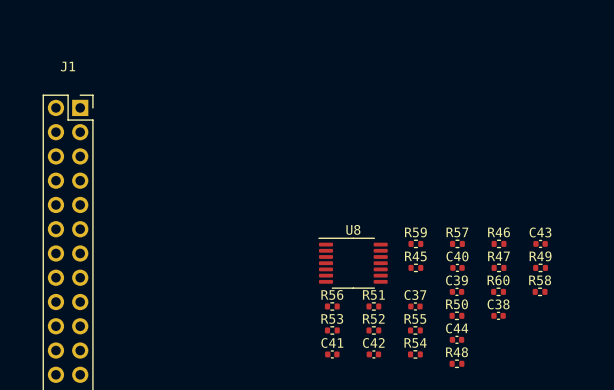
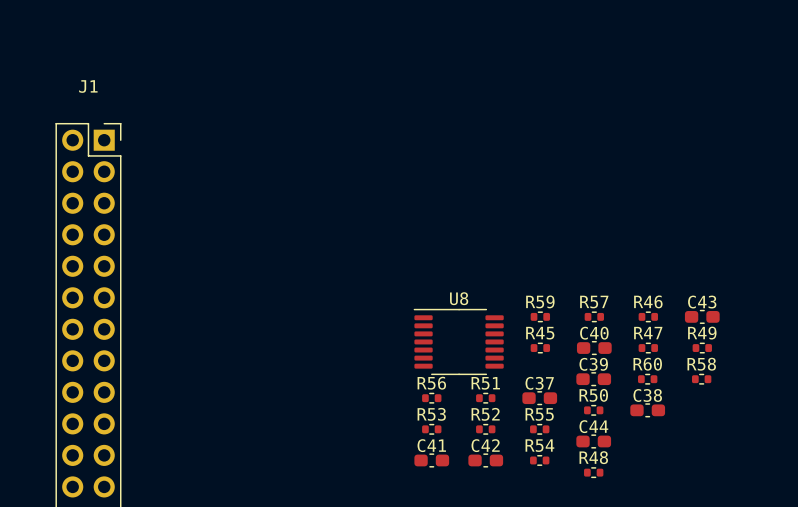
C43 footprint: [533, 239, 548, 248] -> [684, 309, 720, 324]
C40 footprint: [450, 263, 465, 272] -> [576, 340, 612, 356]
C39 footprint: [449, 287, 465, 296] -> [576, 372, 612, 387]
C37 footprint: [408, 302, 423, 311] -> [522, 391, 558, 406]
C38 footprint: [491, 311, 506, 320] -> [630, 403, 666, 418]
C44 footprint: [449, 335, 465, 344] -> [576, 434, 612, 449]
C41 footprint: [325, 350, 340, 359] -> [414, 453, 450, 468]
C42 footprint: [366, 350, 382, 359] -> [468, 453, 504, 468]

